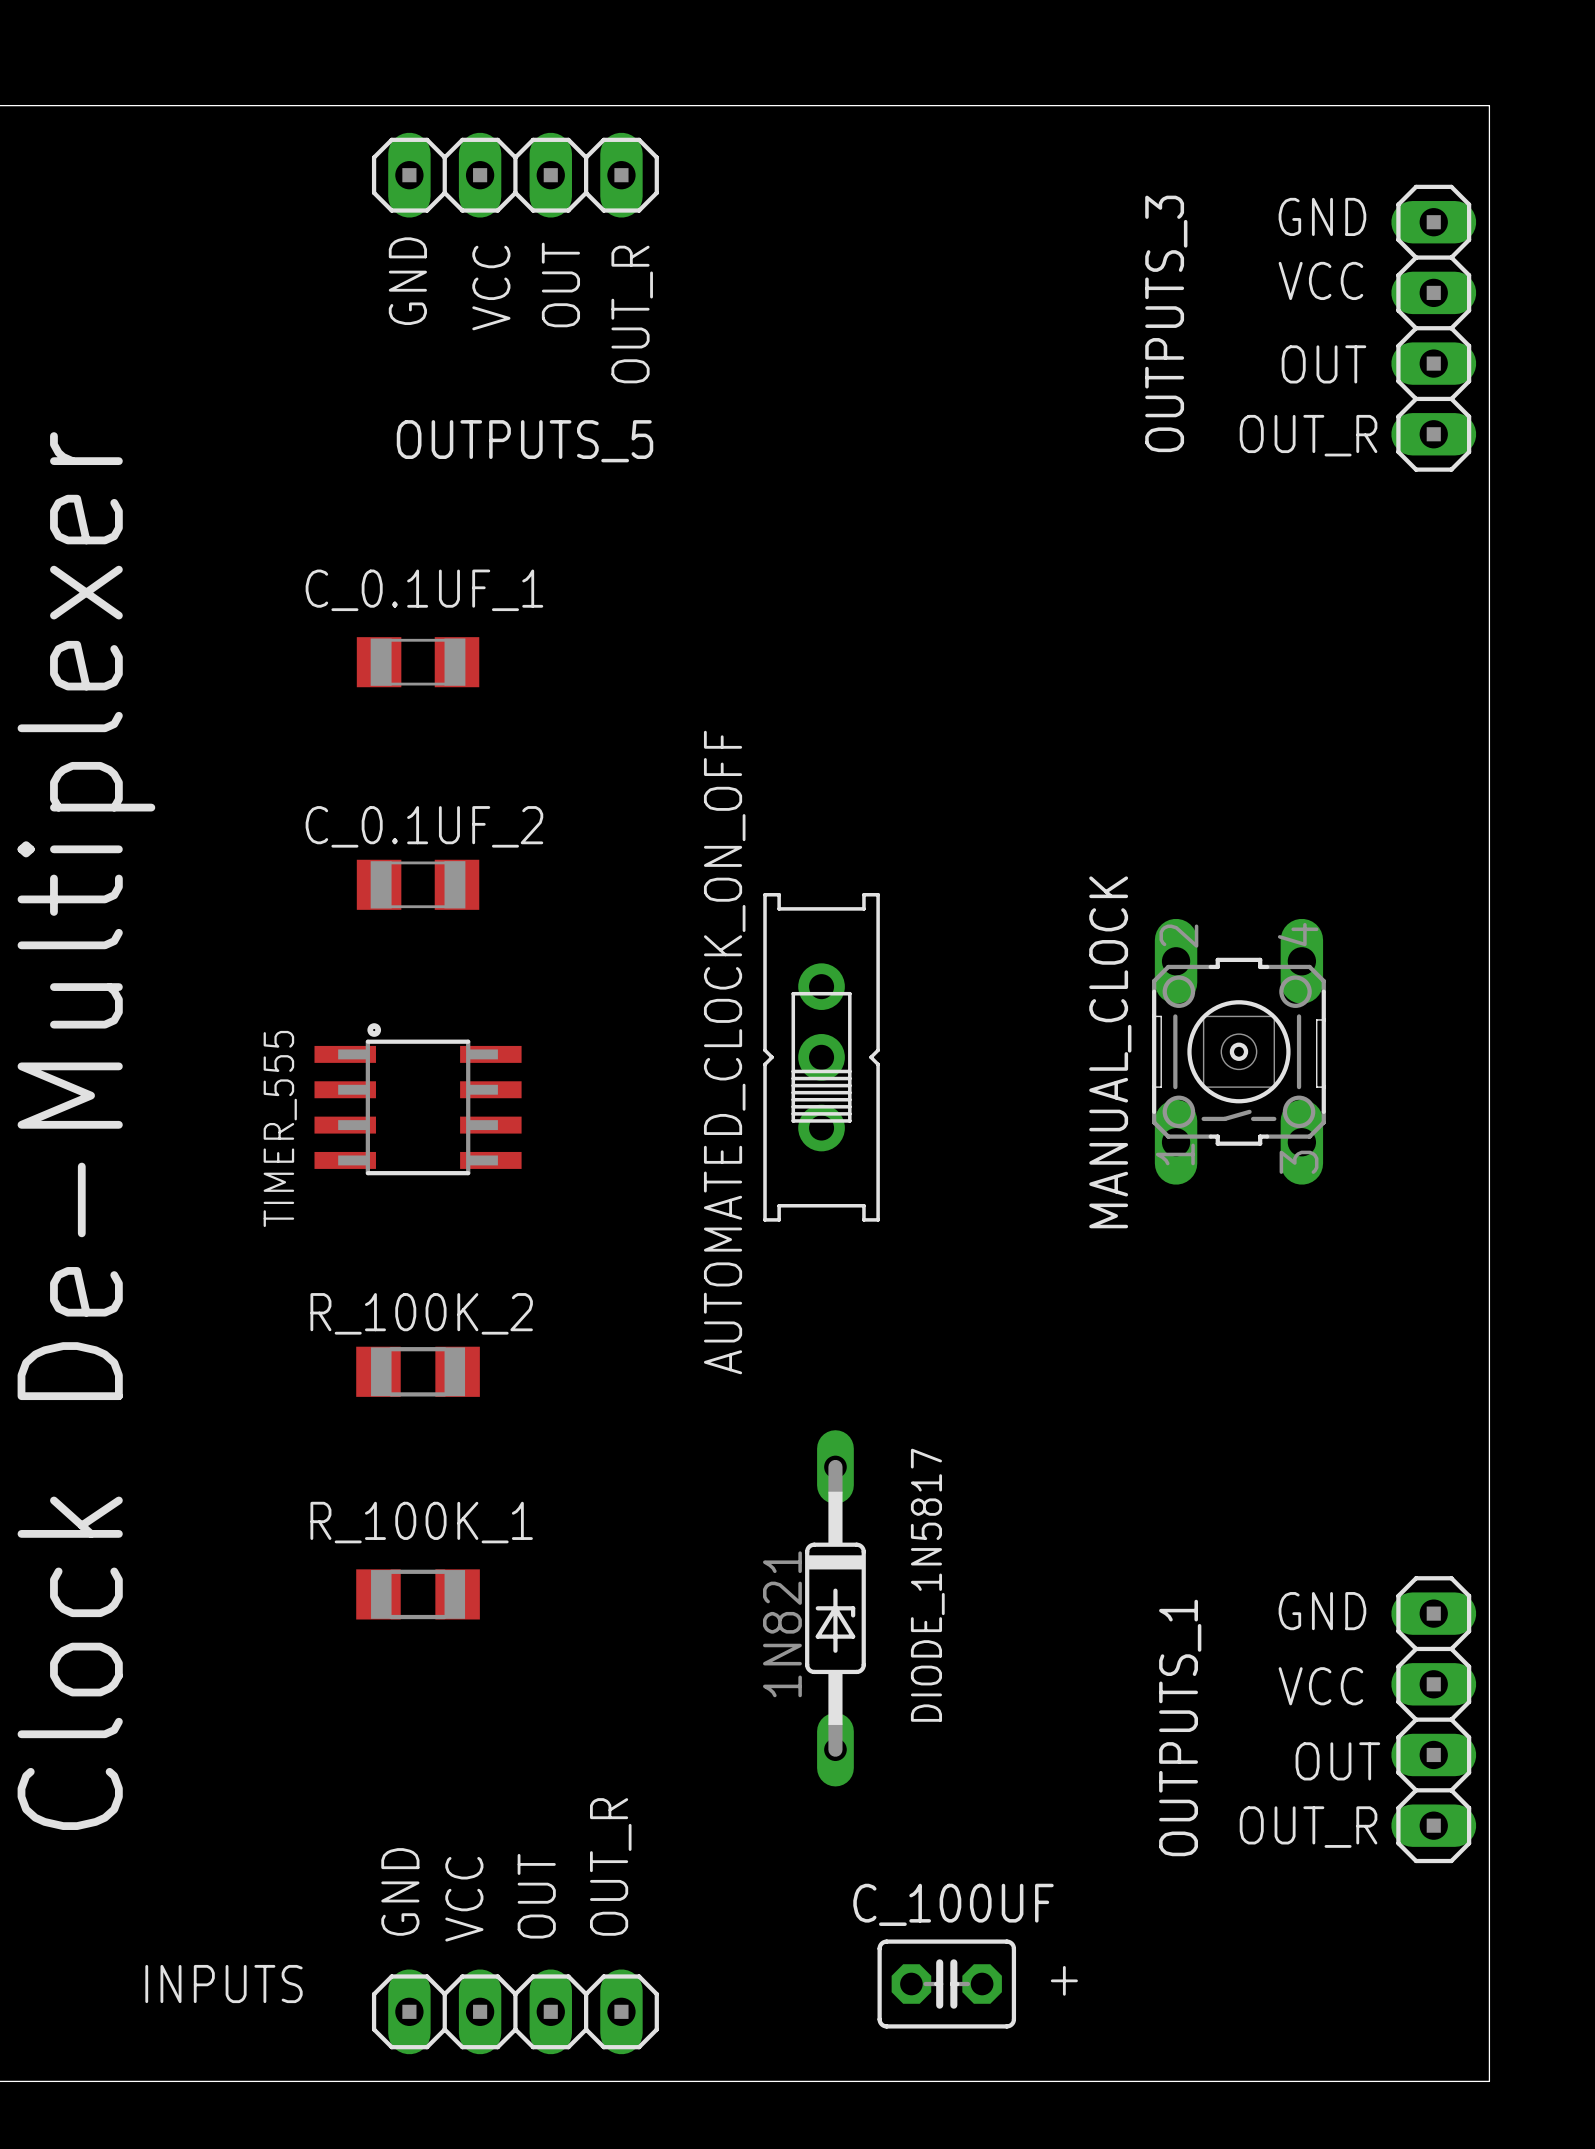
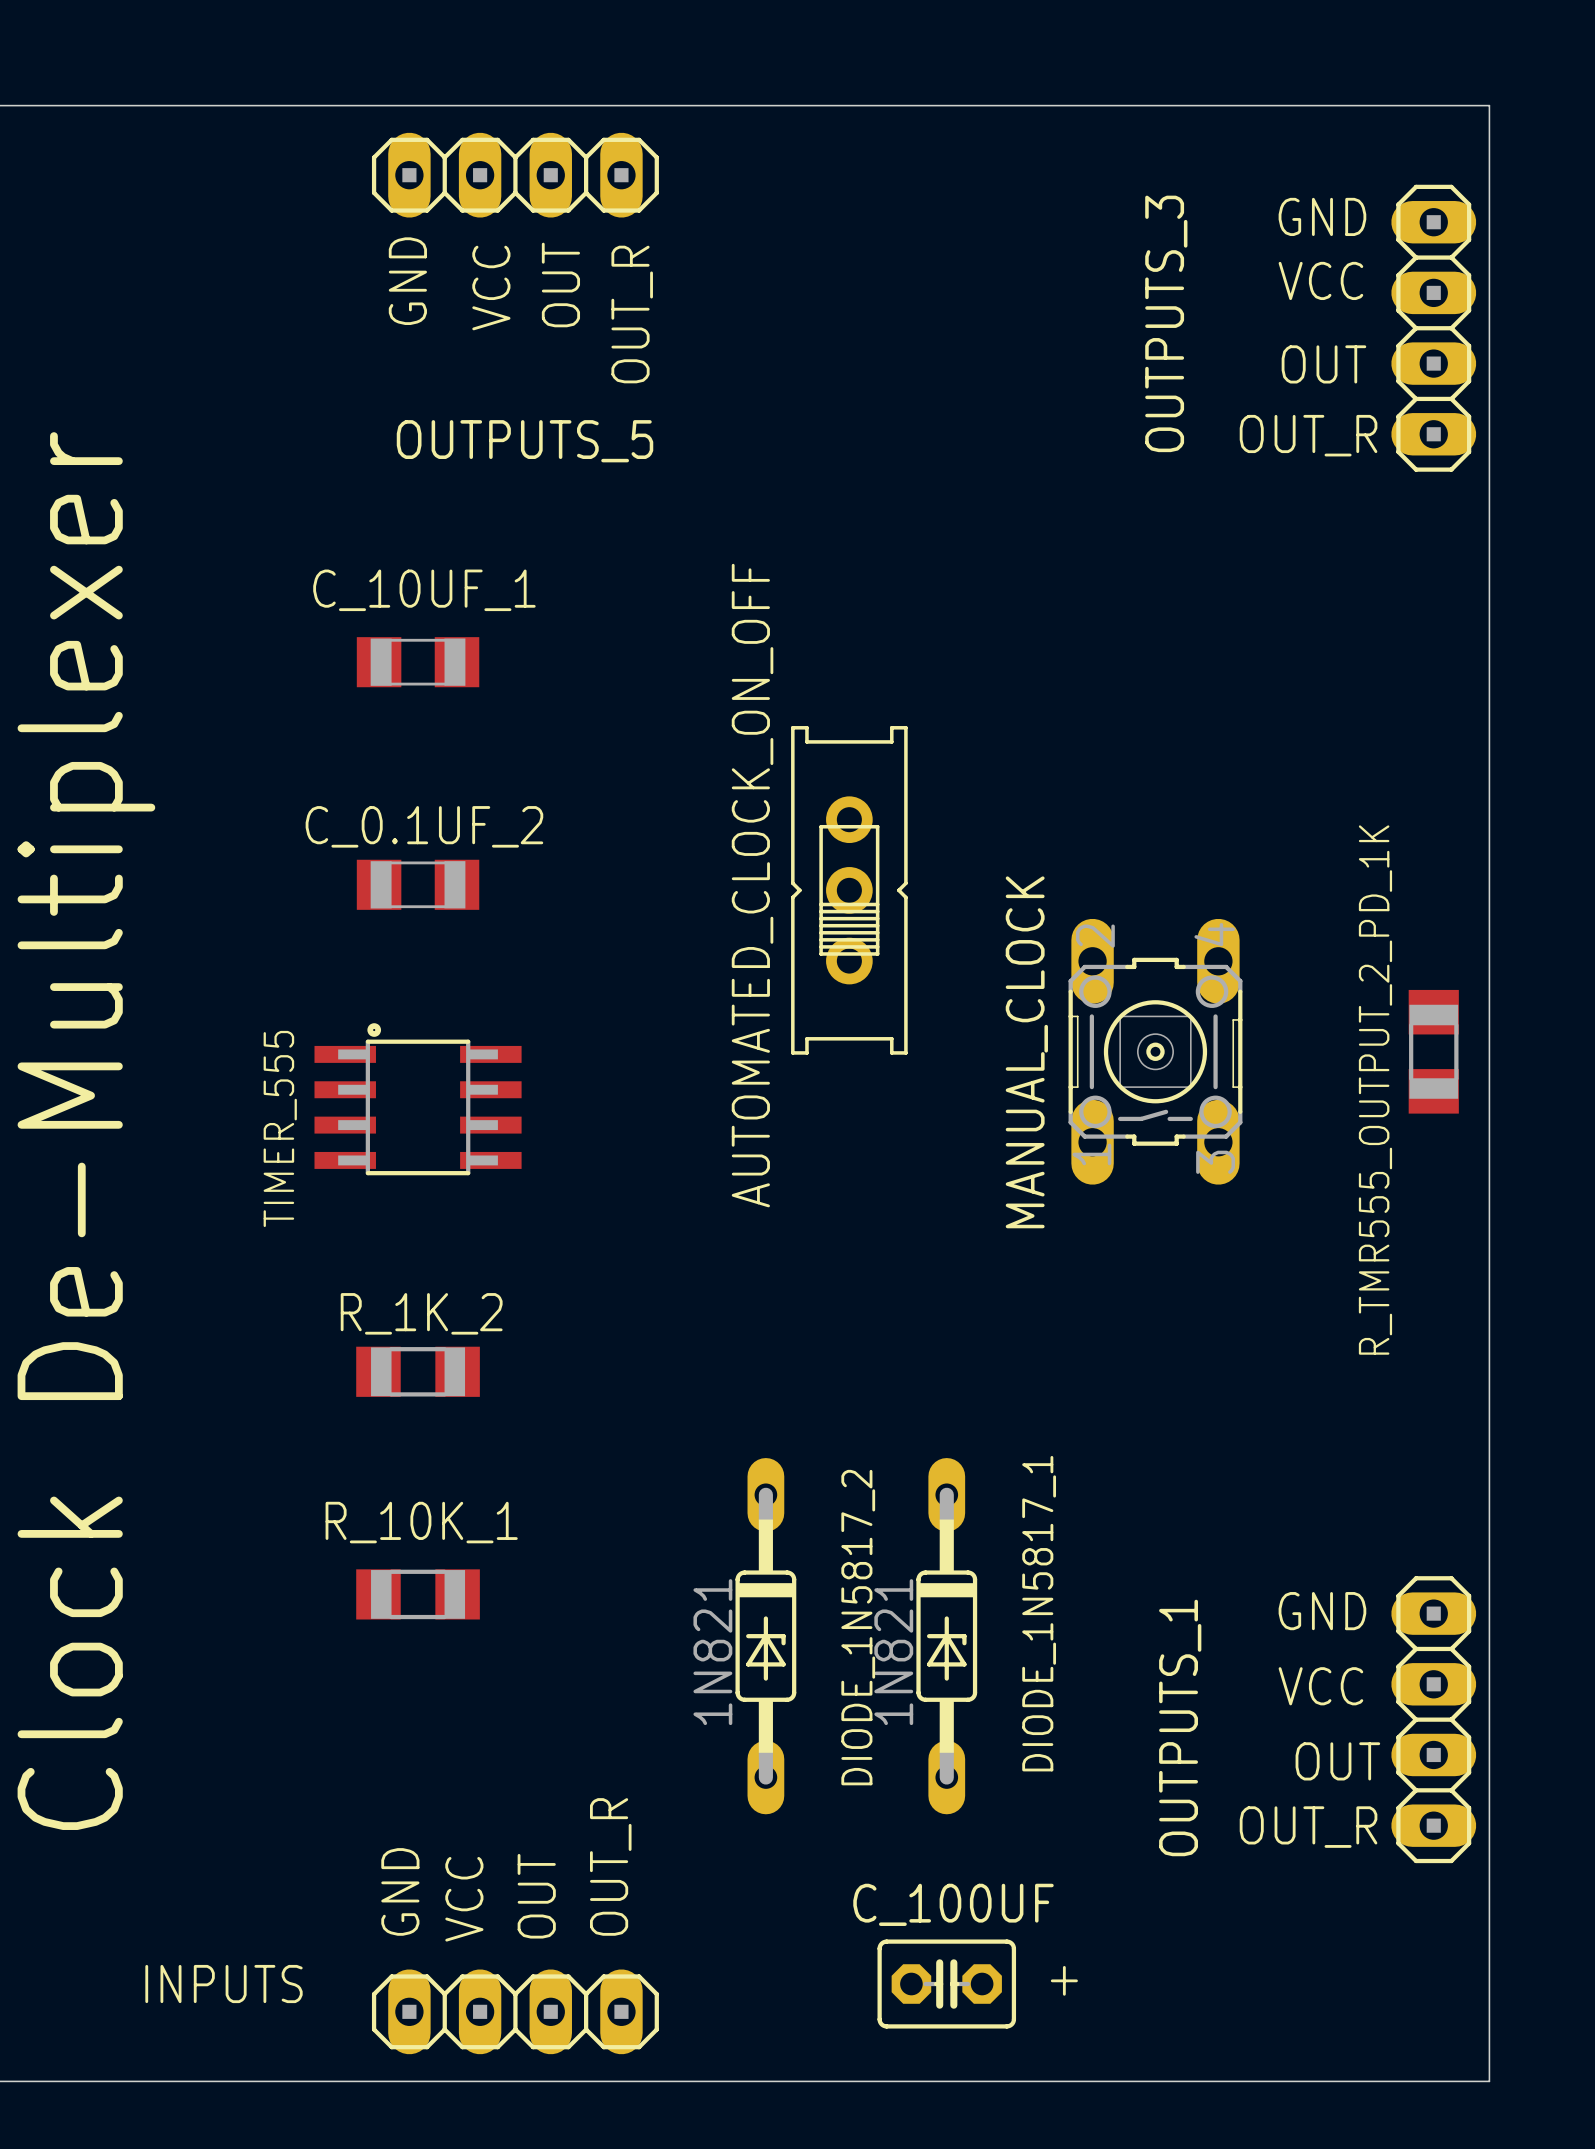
C_0.1UF_1 name: C_0.1UF_1 (424, 590) -> C_10UF_1 (424, 590)
MANUAL_CLOCK position: (1238, 1051) -> (1155, 1051)
R_TMR555_OUTPUT_2_PD_1K: none -> (1433, 1051)
AUTOMATED_CLOCK_ON_OFF position: (821, 1057) -> (849, 890)
R_100K_2 name: R_100K_2 (421, 1313) -> R_1K_2 (421, 1313)
R_100K_1 name: R_100K_1 (421, 1522) -> R_10K_1 (421, 1522)
DIODE_1N5817: 1N821 (835, 1608) -> none
DIODE_1N5817_2: none -> 1N821 (765, 1636)
DIODE_1N5817_1: none -> 1N821 (946, 1636)

